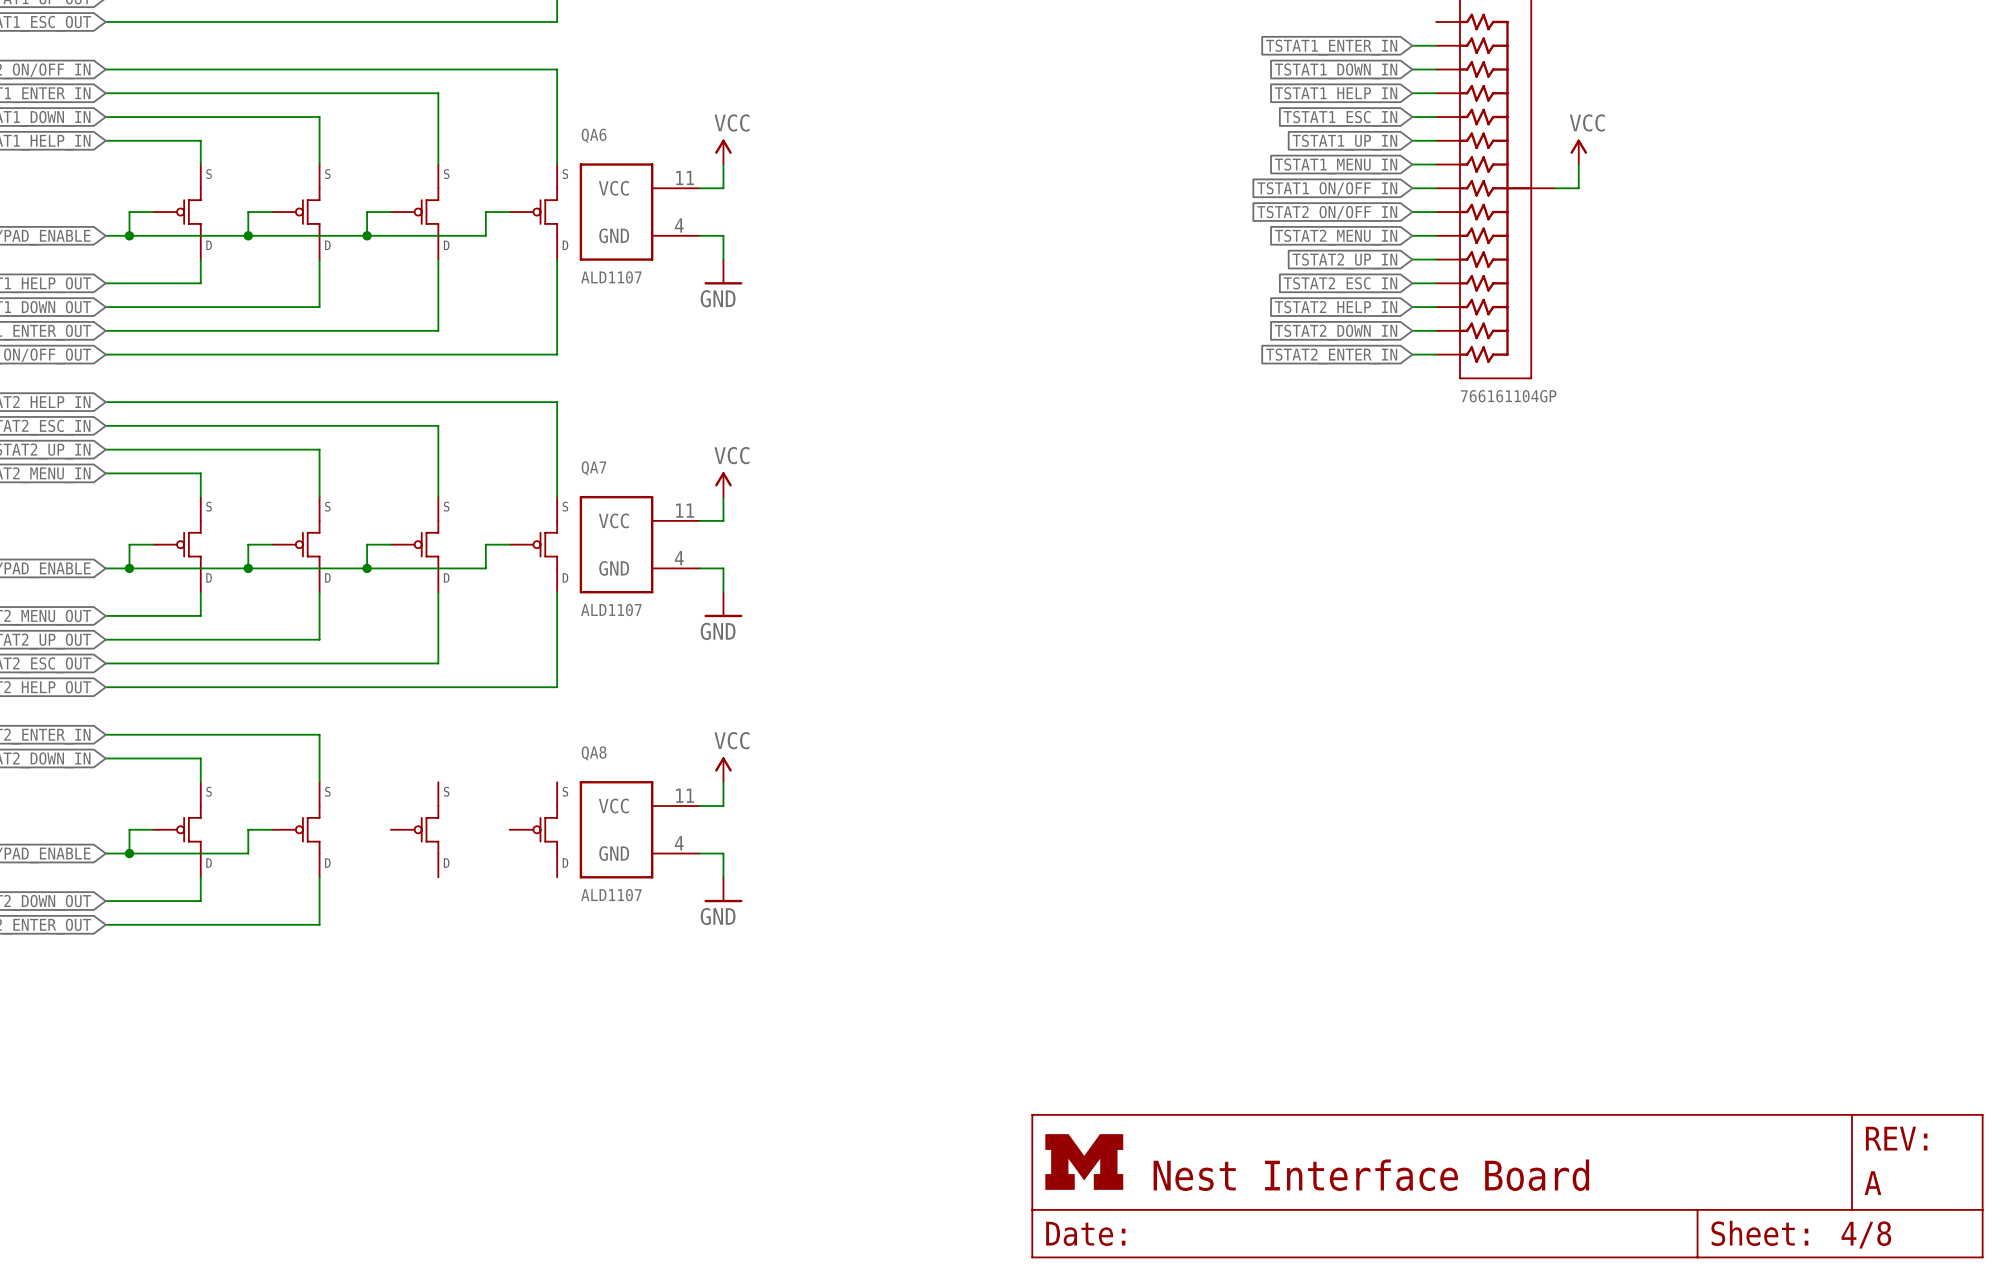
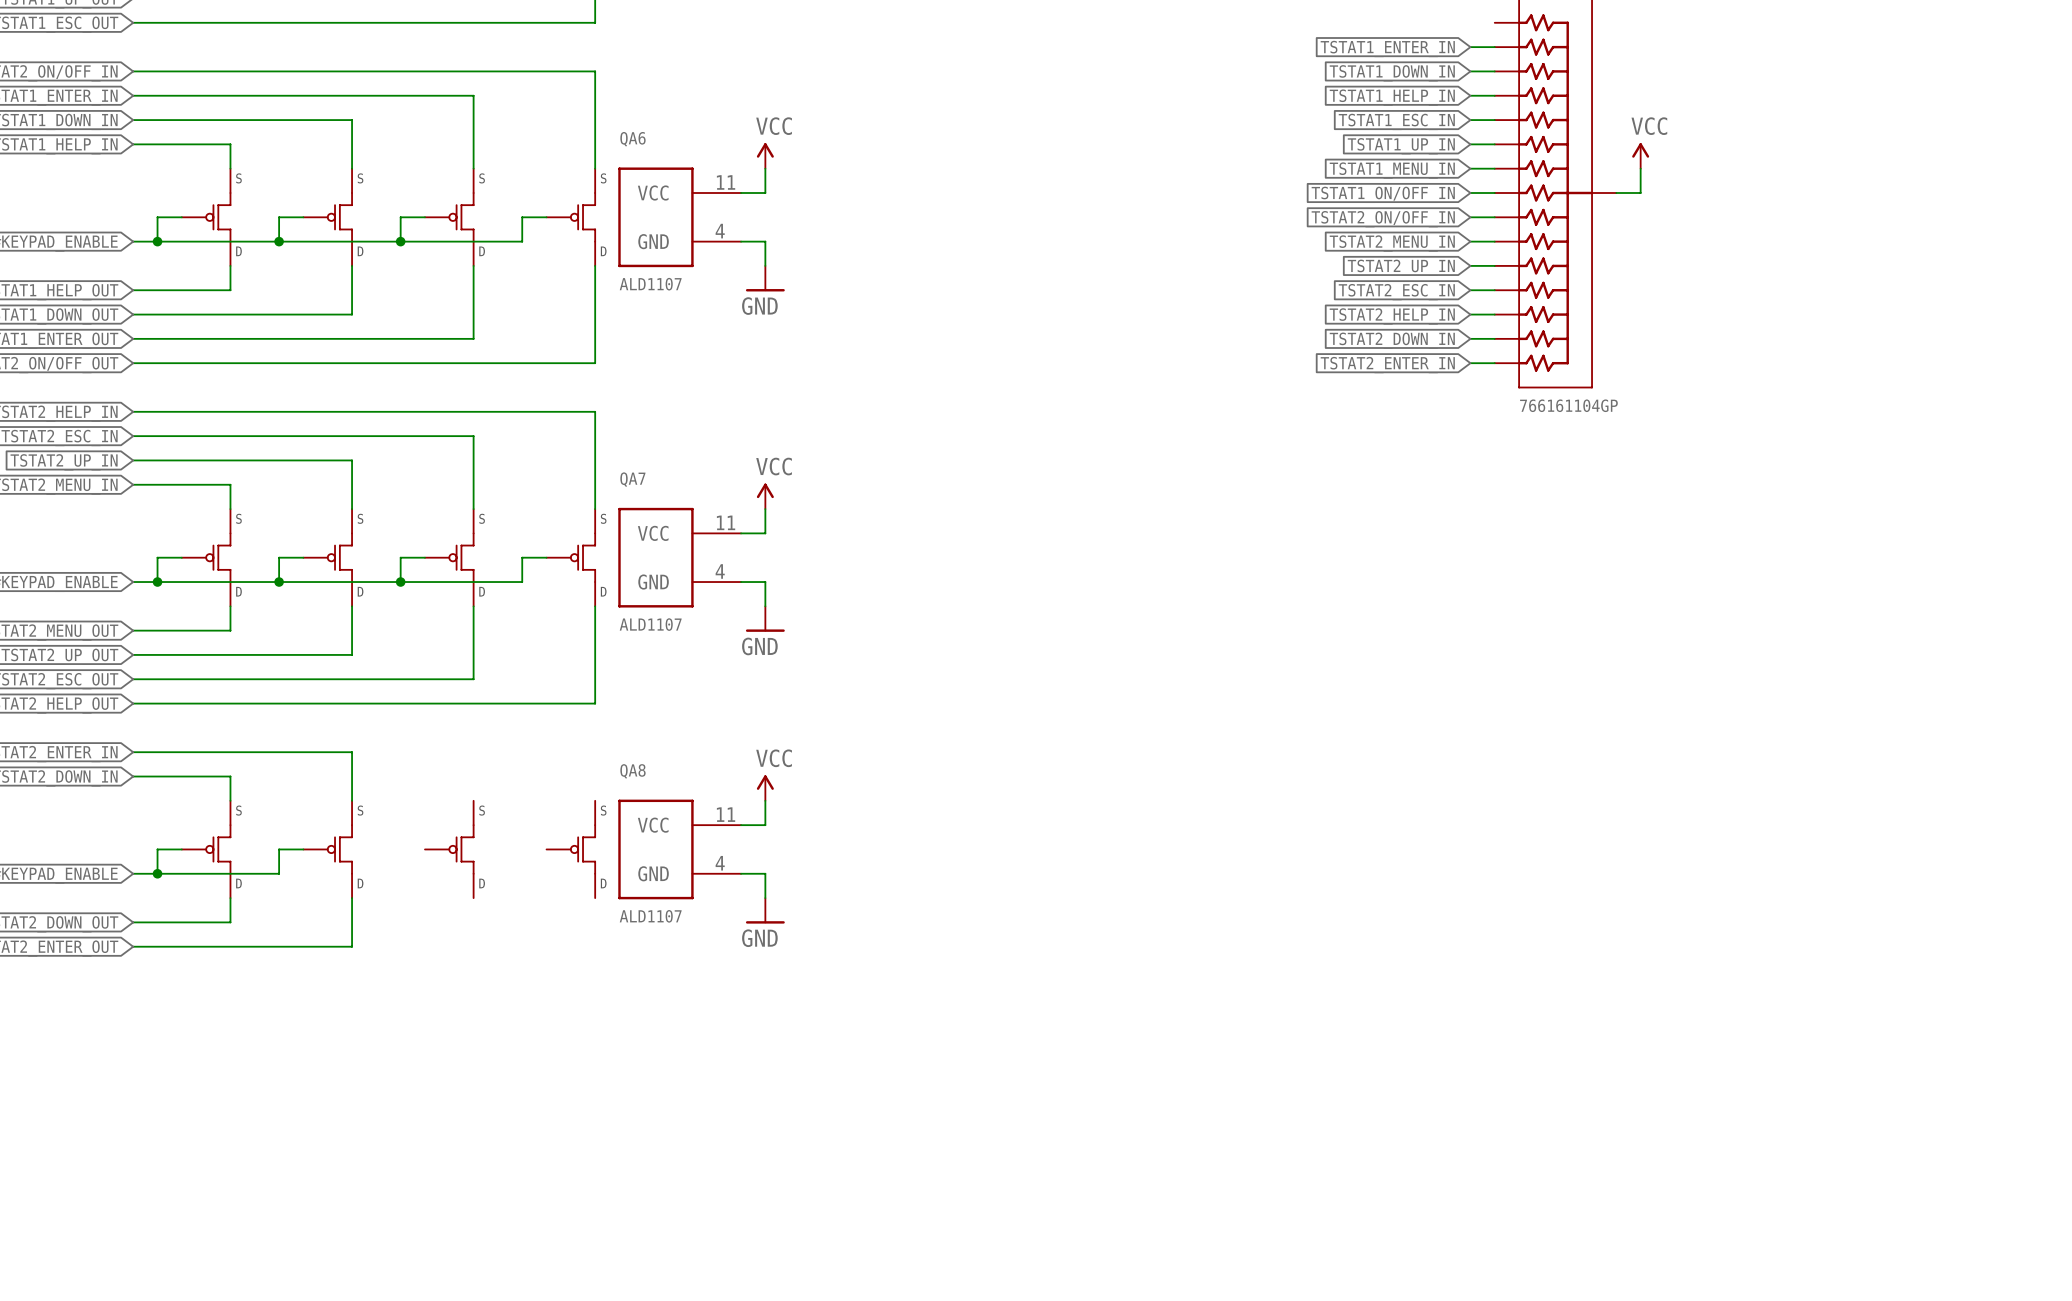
part: (1507, 1186) -> none

